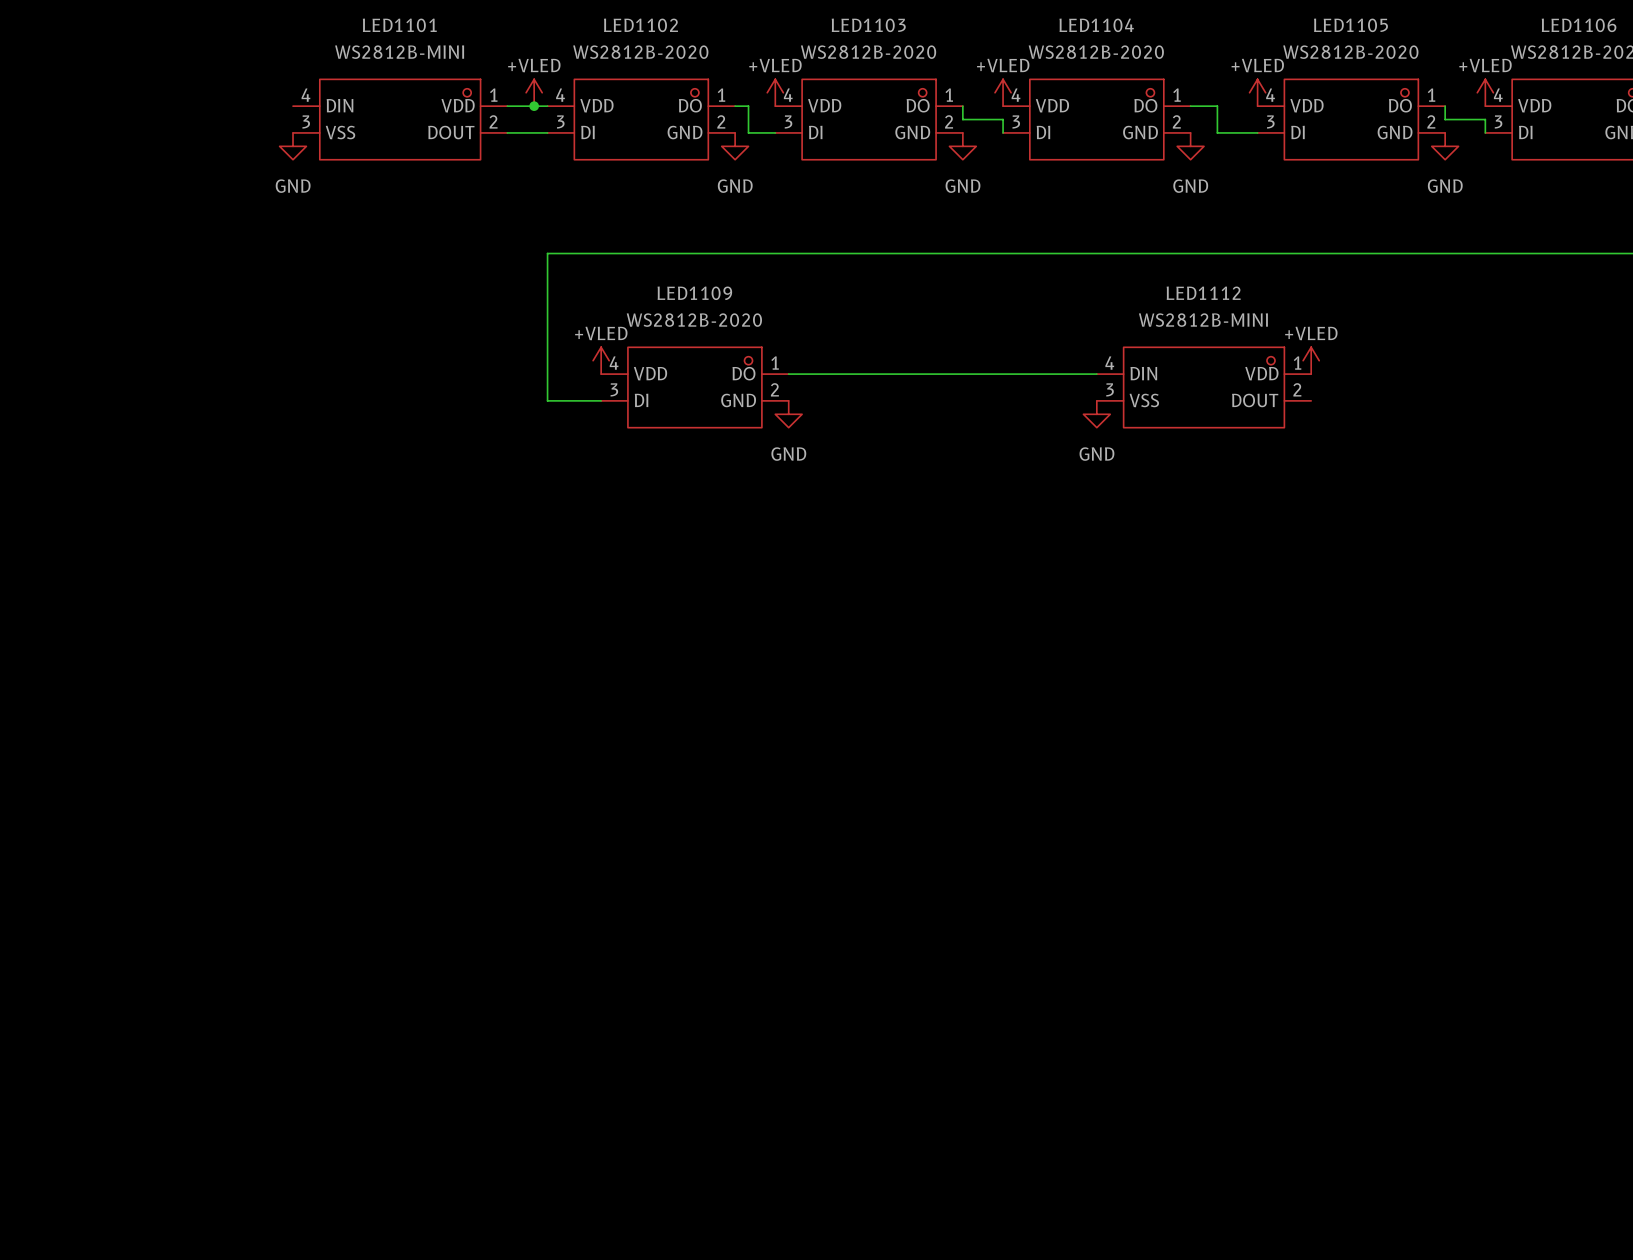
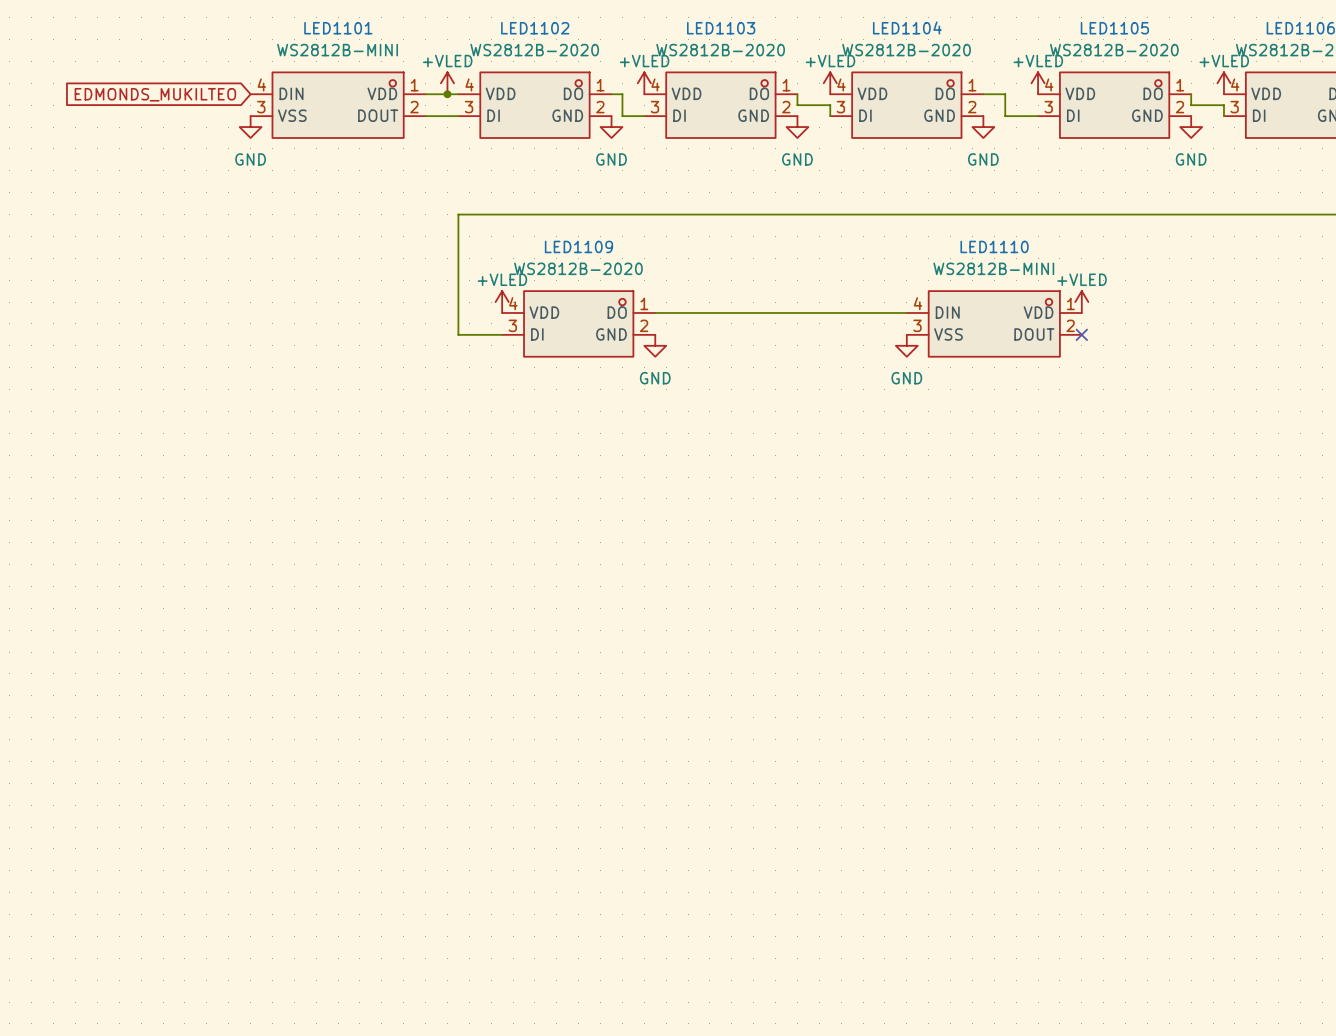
global label: none -> EDMONDS_MUKILTEO (155, 94)
LED1112 name: LED1112 (1203, 293) -> LED1110 (994, 246)
no-connect mark: none -> (1081, 334)

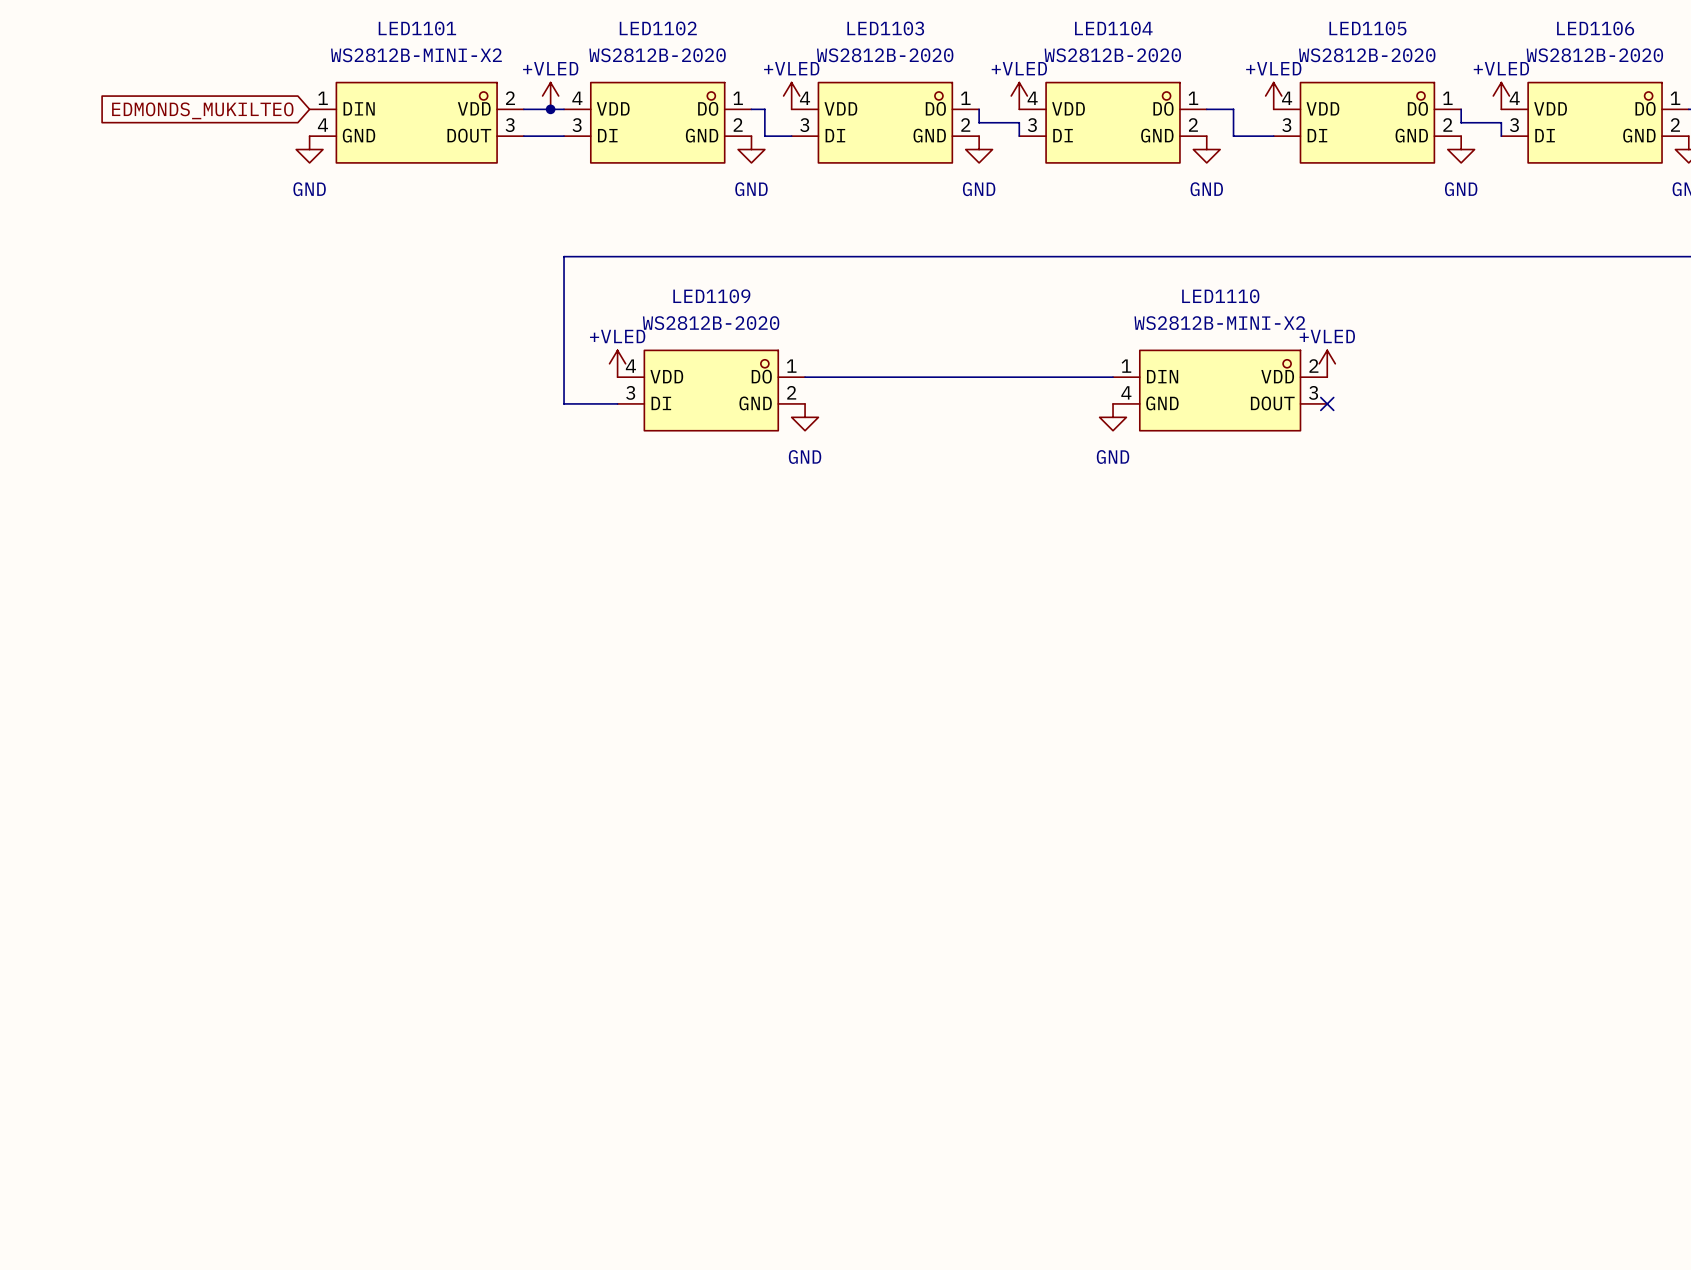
LED1101 value: WS2812B-MINI (337, 50) -> WS2812B-MINI-X2 (416, 55)
LED1101 pin number: 4 (261, 84) -> 1 (323, 98)
LED1101 pin number: 1 (414, 85) -> 2 (510, 98)
LED1101 pin number: 3 (261, 107) -> 4 (322, 125)
LED1101 pin number: 2 (414, 107) -> 3 (510, 125)
LED1101 pin name: VSS (292, 115) -> GND (359, 135)
LED1110 value: WS2812B-MINI (993, 268) -> WS2812B-MINI-X2 (1219, 323)
LED1110 pin number: 4 (918, 303) -> 1 (1126, 366)
LED1110 pin number: 1 (1070, 303) -> 2 (1313, 366)
LED1110 pin number: 3 (917, 325) -> 4 (1126, 392)
LED1110 pin number: 2 (1070, 325) -> 3 (1313, 392)
LED1110 pin name: VSS (948, 334) -> GND (1162, 403)

